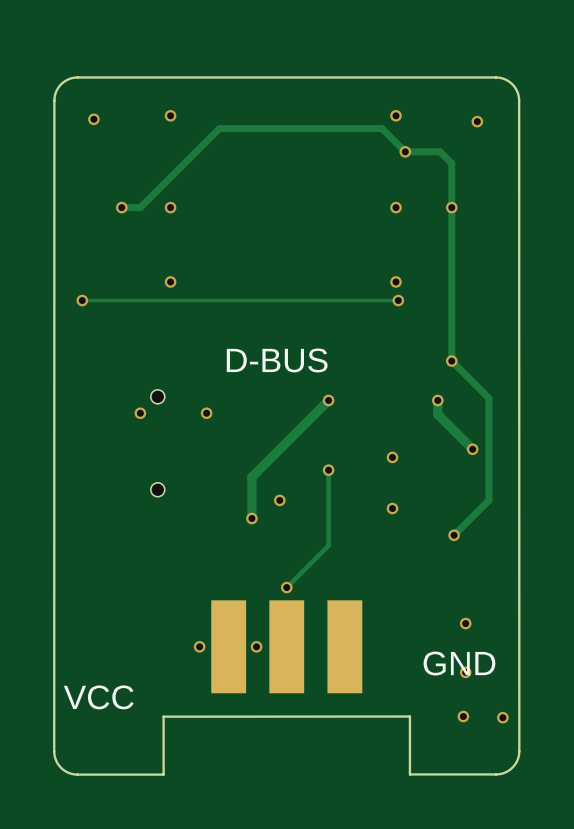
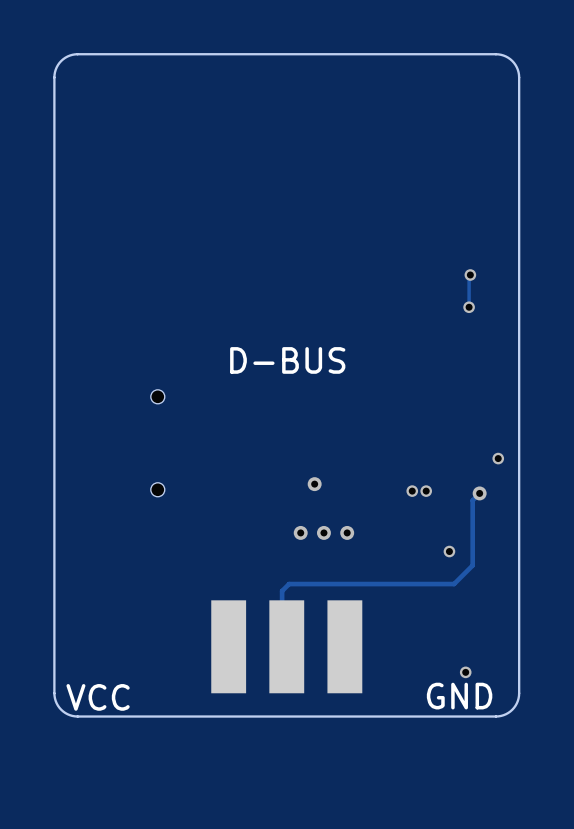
board edge: (495, 77) (77, 77) (67, 79) (57, 88) (54, 100) (54, 751) (57, 763) (65, 771) (77, 774) (163, 774) (163, 716) (409, 716) (409, 774) (498, 774) (508, 770) (515, 763) (519, 751) (519, 100) (516, 90) (512, 84) (506, 79) (495, 77) -> (495, 54) (506, 56) (512, 61) (516, 67) (519, 77) (519, 693) (515, 705) (508, 712) (495, 716) (77, 716) (65, 712) (57, 705) (54, 693) (54, 77) (57, 65) (65, 57) (77, 54) (495, 54)
via: (170, 115) -> none
via: (395, 115) -> none
via: (93, 119) -> none
via: (477, 121) -> none
via: (405, 151) -> none
track: (121, 207) (140, 207) (219, 128) (382, 128) (405, 151) (440, 151) (451, 163) (451, 361) (488, 398) (488, 500) (454, 535) -> none
via: (121, 207) -> none
via: (170, 207) -> none
via: (395, 207) -> none
via: (451, 207) -> none
track: none -> (470, 274) (469, 307)
via: none -> (470, 274)
via: (170, 281) -> none
via: (395, 281) -> none
via: (82, 300) -> none
track: (398, 300) (82, 300) -> none
via: (398, 300) -> none
via: none -> (469, 307)
via: (451, 361) -> none
track: (328, 400) (251, 477) (251, 518) -> none
via: (328, 400) -> none
track: (437, 400) (437, 414) (472, 449) -> none
via: (437, 400) -> none
via: (140, 413) -> none
via: (206, 413) -> none
via position: (472, 449) -> (498, 458)
via: (392, 457) -> none
track: (328, 470) (328, 545) (286, 587) -> none
via: (328, 470) -> none
via: none -> (314, 484)
via: none -> (412, 491)
via: none -> (426, 491)
track: none -> (479, 493) (472, 500) (472, 565) (454, 584) (289, 584) (282, 591) (282, 646)
via: none -> (479, 493)
via: (279, 500) -> none
via: (392, 508) -> none
via: (251, 518) -> none
via: none -> (300, 532)
via: none -> (323, 532)
via: none -> (347, 532)
via position: (454, 535) -> (449, 551)
via: (286, 587) -> none
via: (465, 623) -> none
via: (199, 646) -> none
via: (256, 646) -> none
text position: GND (459, 663) -> GND (459, 696)
via: (463, 716) -> none
via: (502, 717) -> none

